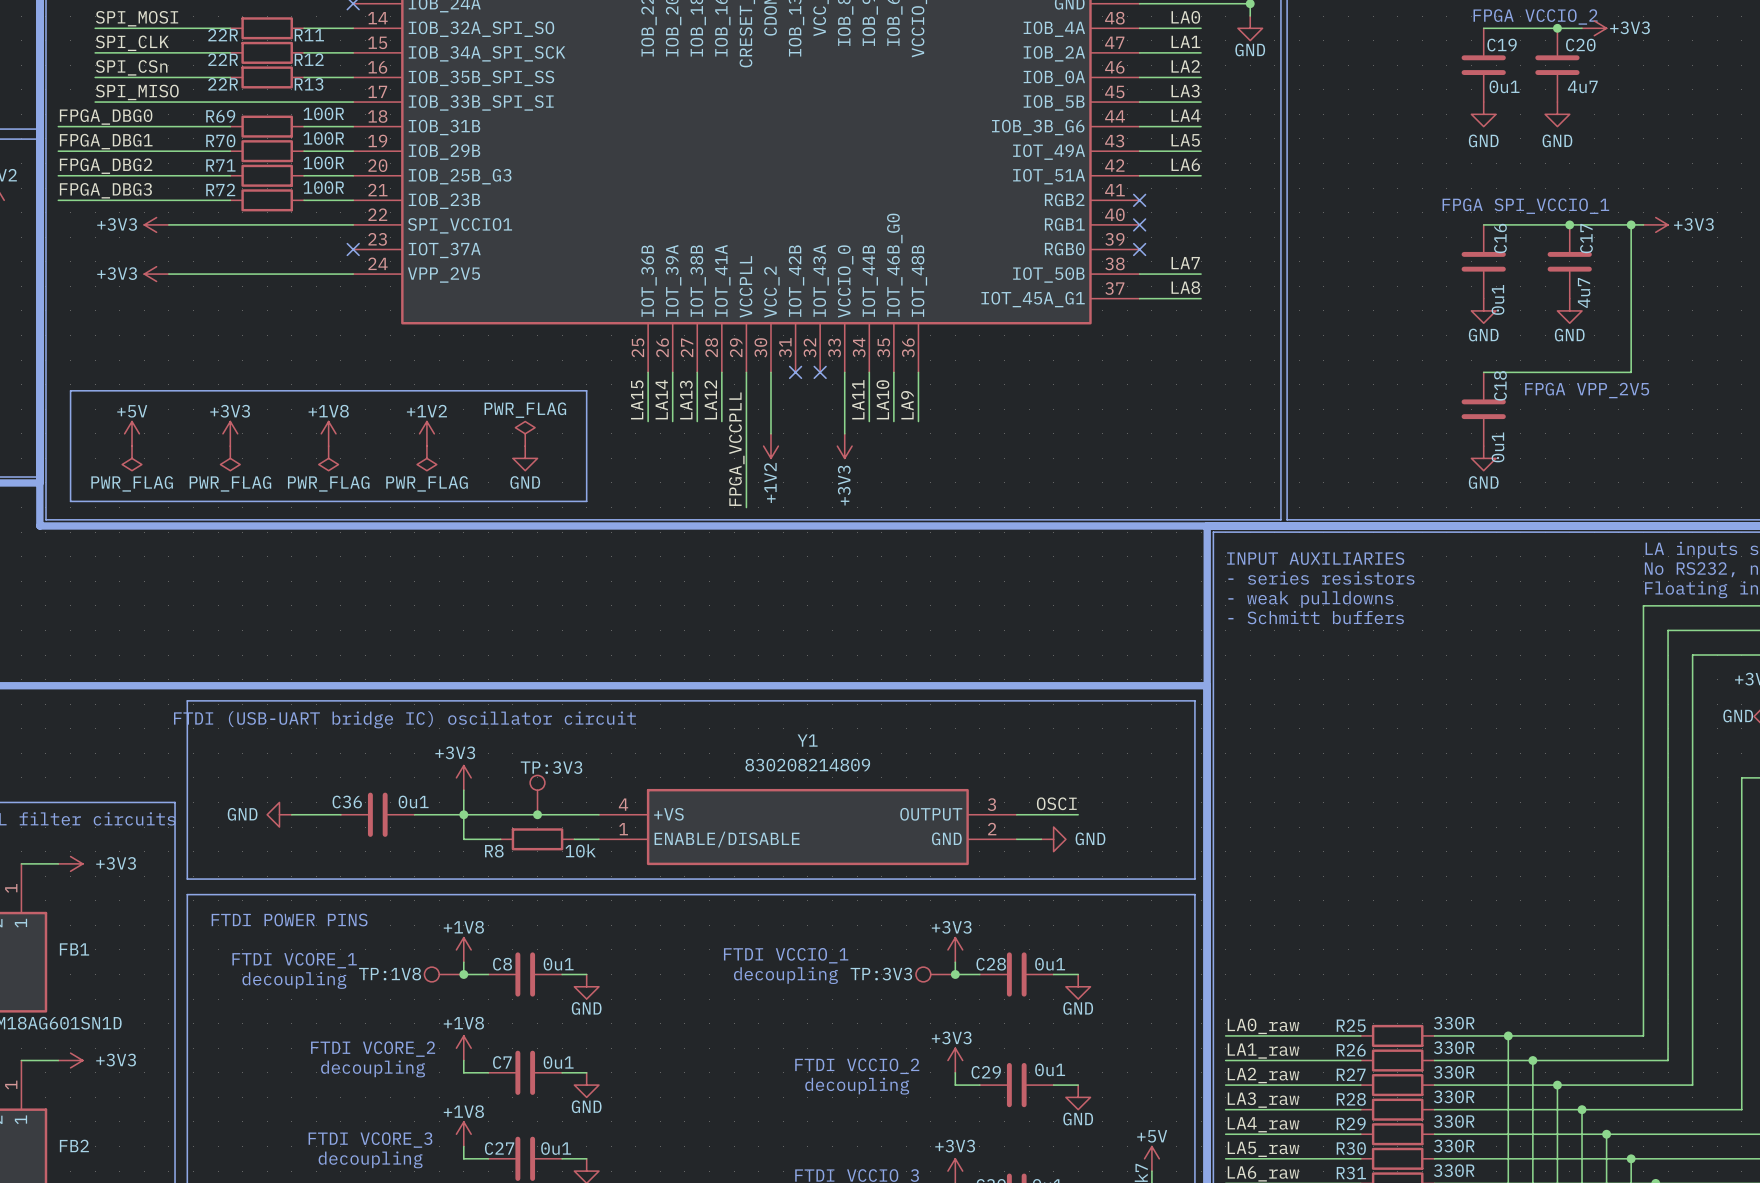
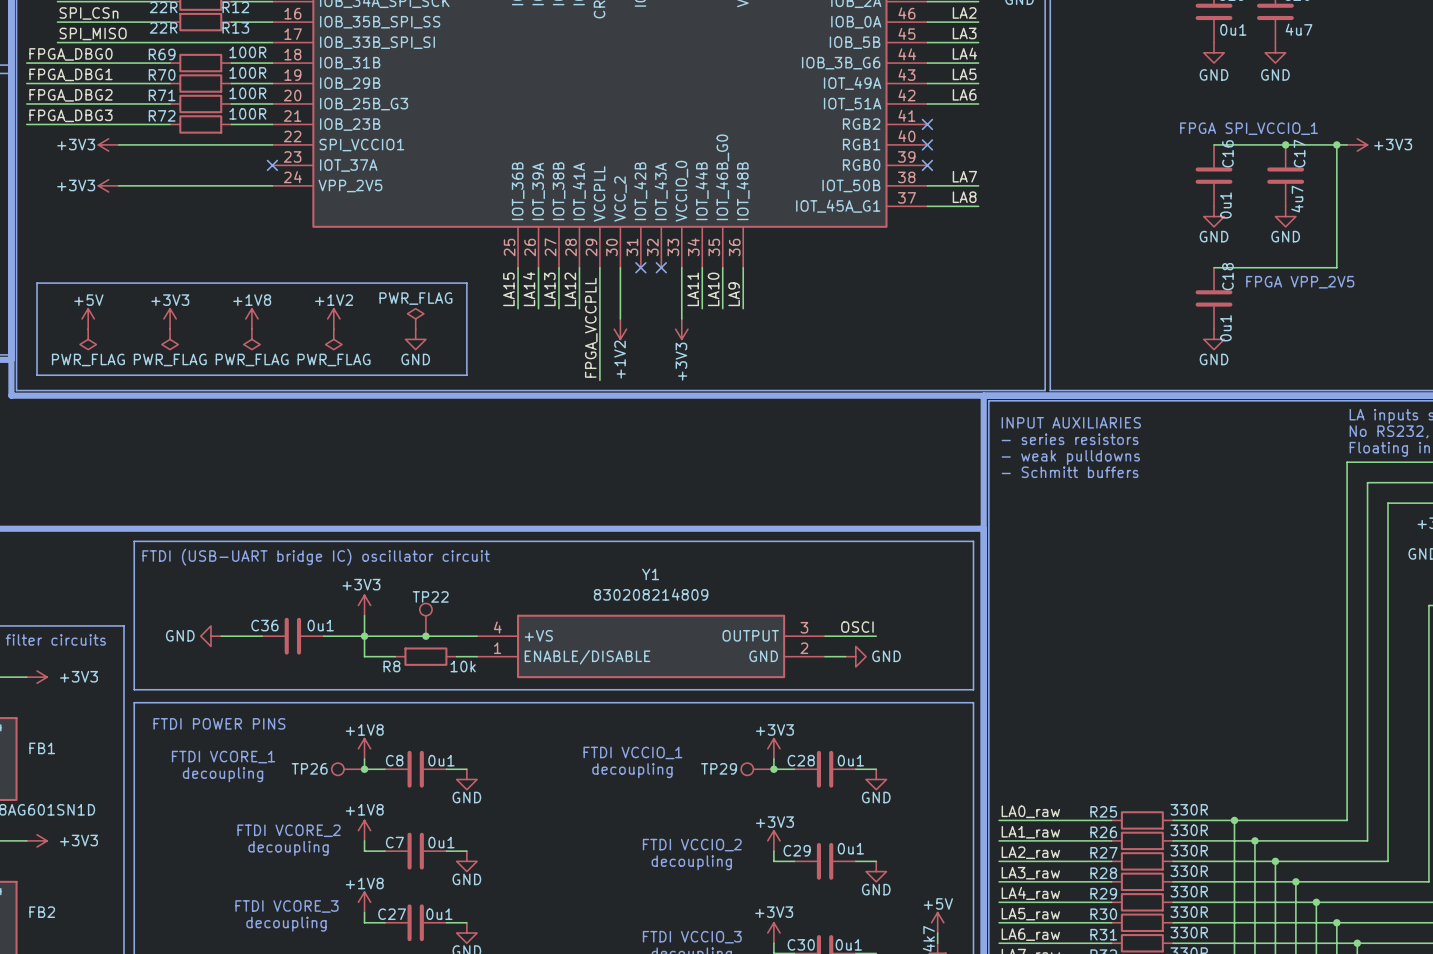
TP22 name: TP:3V3 (551, 767) -> TP22 (430, 596)
TP26 name: TP:1V8 (390, 974) -> TP26 (309, 768)
TP29 name: TP:3V3 (881, 974) -> TP29 (719, 768)

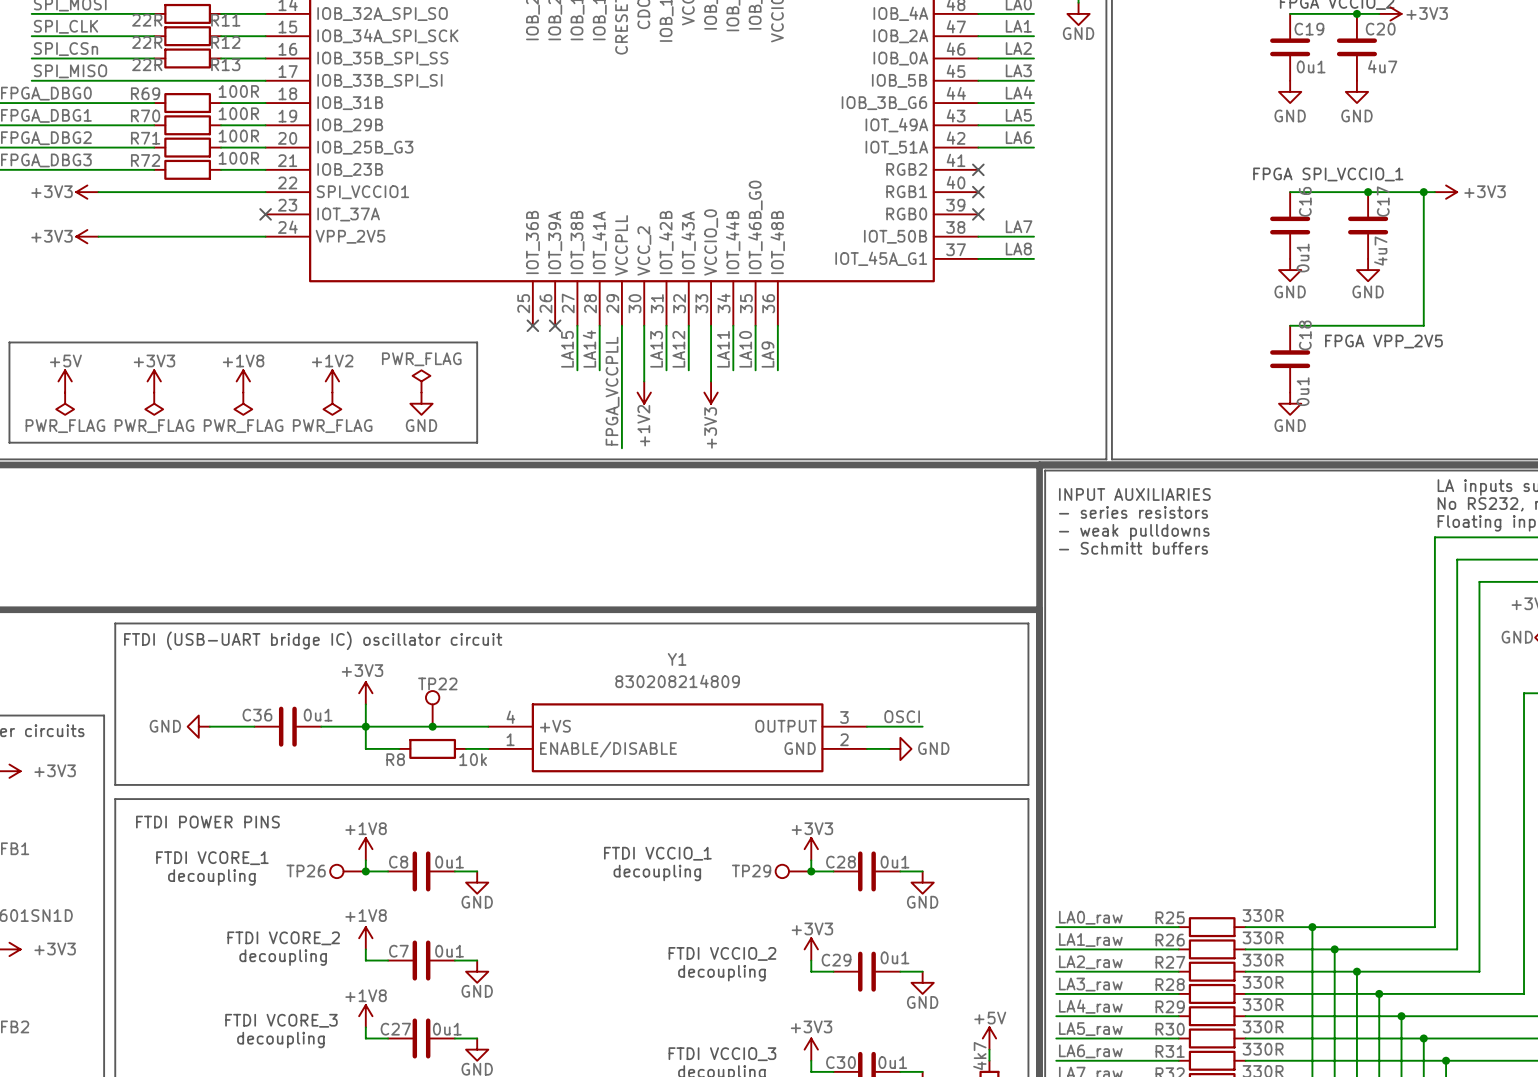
wire: (518, 267) (518, 308) -> (688, 325) (688, 370)
no-connect mark: none -> (532, 325)
wire: (538, 267) (538, 308) -> (666, 325) (666, 370)
no-connect mark: none -> (555, 325)
no-connect mark: (640, 267) -> none
no-connect mark: (661, 267) -> none
label: LA15 (508, 289) -> none
label: LA14 (529, 289) -> none
label: LA13 (549, 289) -> LA15 (567, 349)
label: LA12 (570, 289) -> LA14 (589, 349)
label: none -> LA13 (656, 349)
label: none -> LA12 (678, 349)

